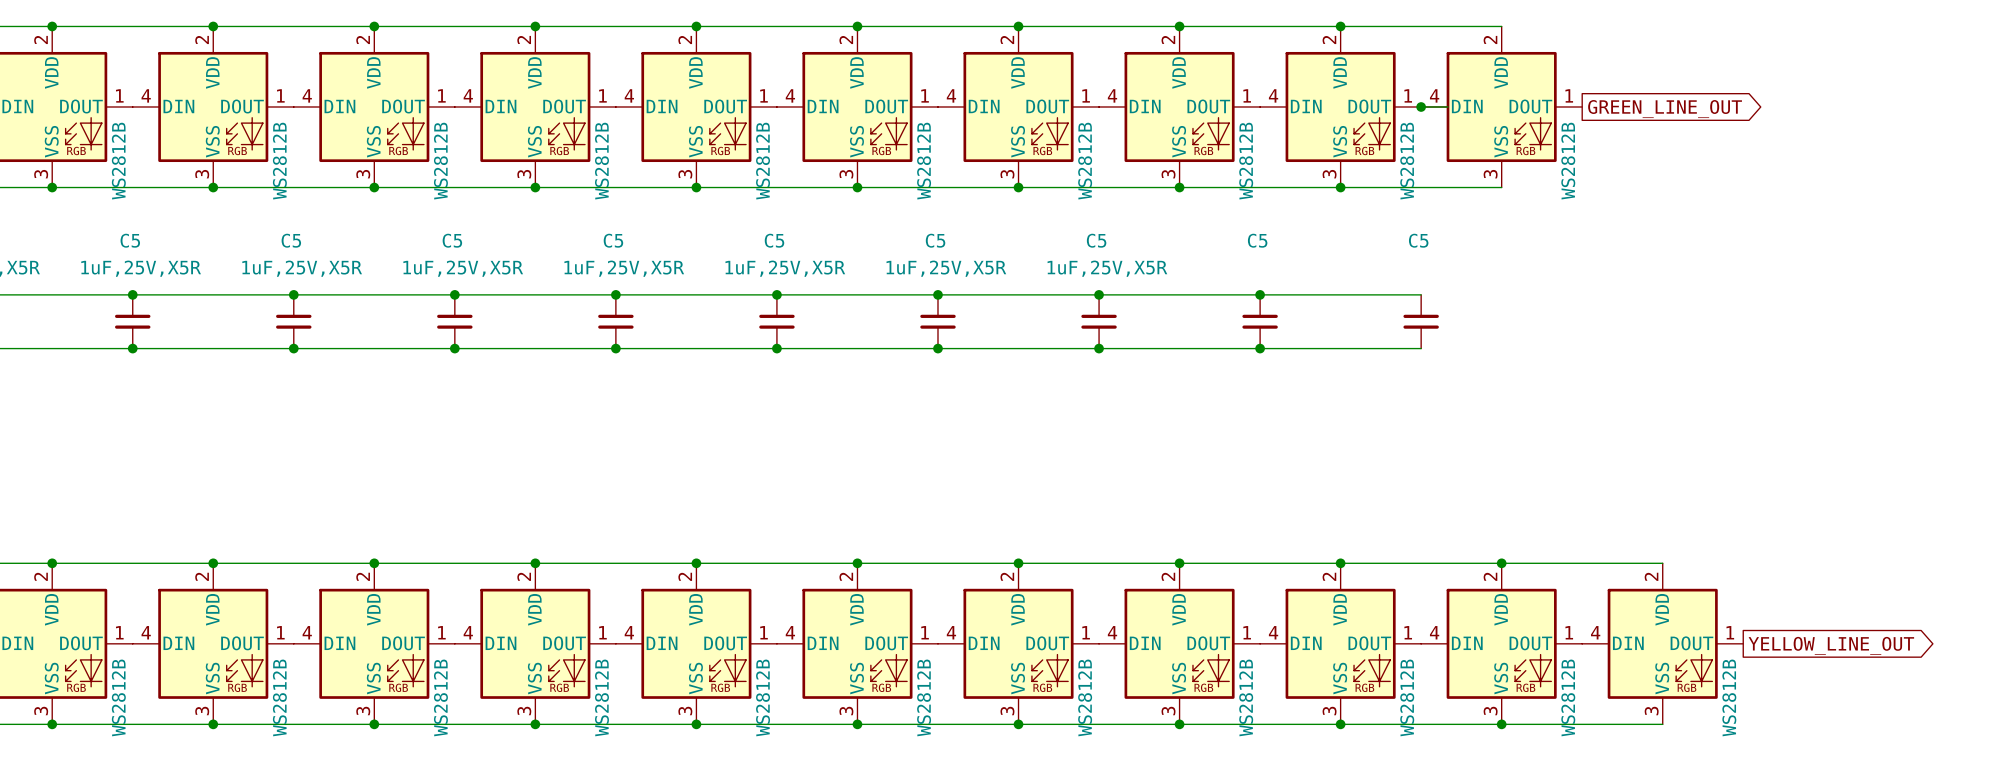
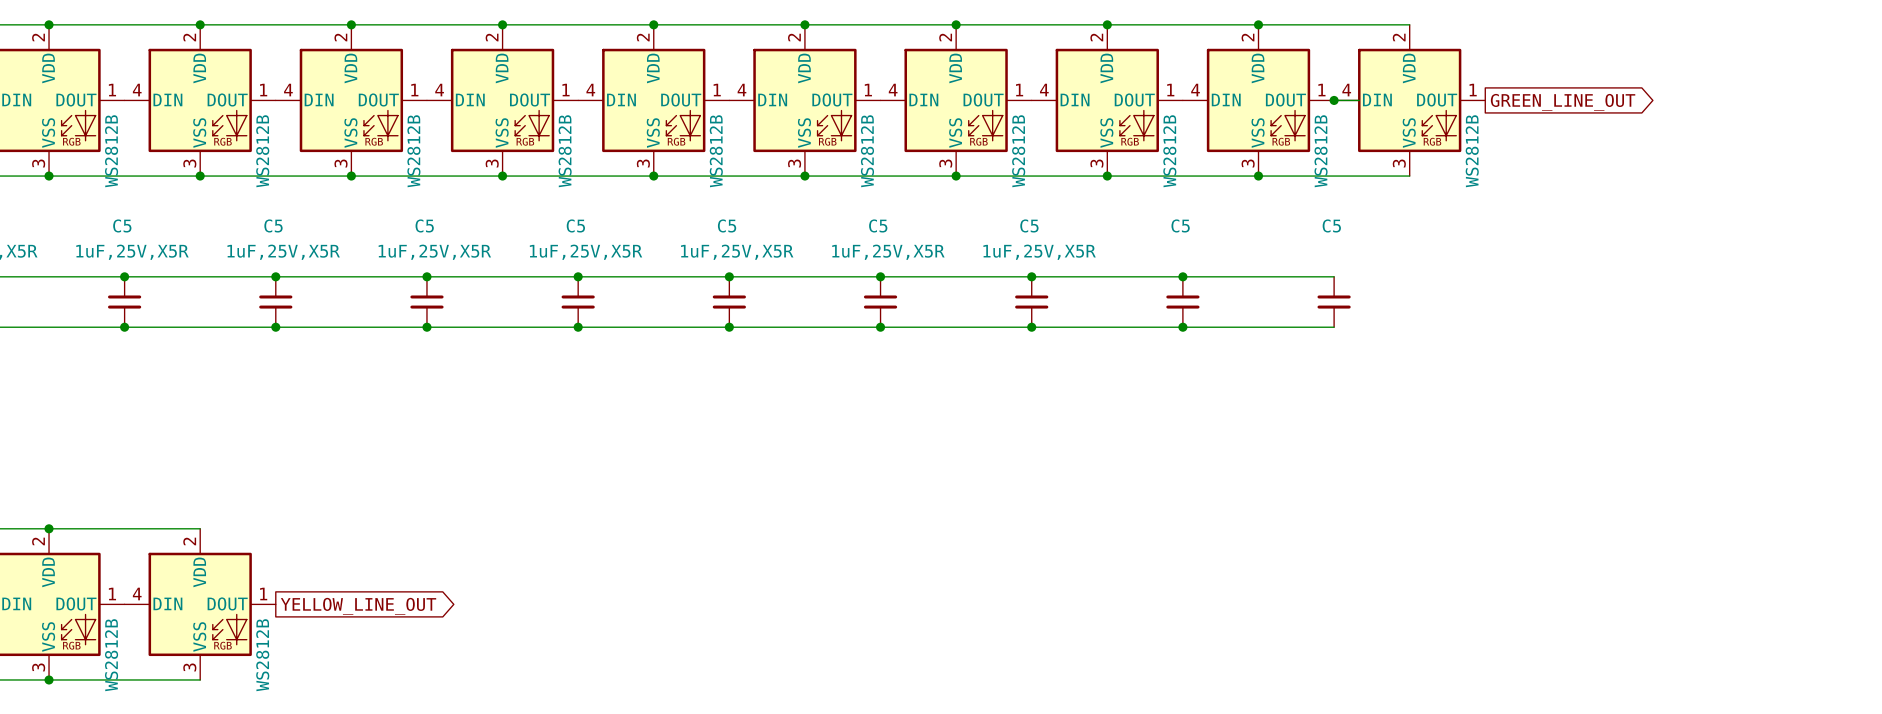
wire: (213, 563) (1662, 563) -> none
junction: (213, 563) -> none
junction: (374, 563) -> none
junction: (535, 563) -> none
junction: (696, 563) -> none
junction: (857, 563) -> none
junction: (1018, 563) -> none
junction: (1179, 563) -> none
junction: (1340, 563) -> none
junction: (1501, 563) -> none
part: WS2812B (374, 643) -> none
part: WS2812B (535, 643) -> none
part: WS2812B (696, 643) -> none
part: WS2812B (857, 643) -> none
part: WS2812B (1018, 643) -> none
part: WS2812B (1179, 643) -> none
part: WS2812B (1340, 643) -> none
part: WS2812B (1501, 643) -> none
part: WS2812B (1662, 643) -> none
global label: none -> YELLOW_LINE_OUT (358, 606)
global label: YELLOW_LINE_OUT (1831, 645) -> none
wire: (213, 724) (1662, 724) -> none
junction: (213, 724) -> none
junction: (374, 724) -> none
junction: (535, 724) -> none
junction: (696, 724) -> none
junction: (857, 724) -> none
junction: (1018, 724) -> none
junction: (1179, 724) -> none
junction: (1340, 724) -> none
junction: (1501, 724) -> none

